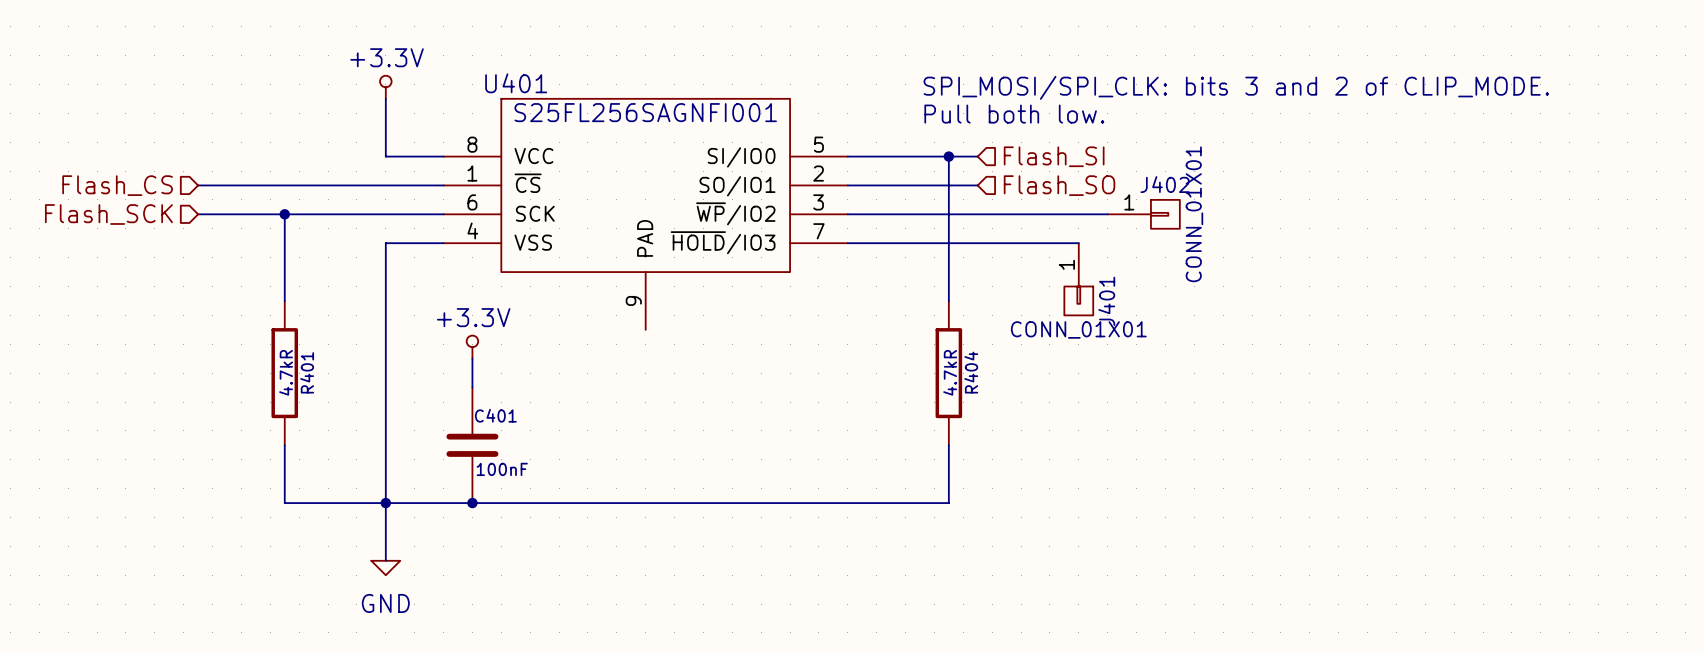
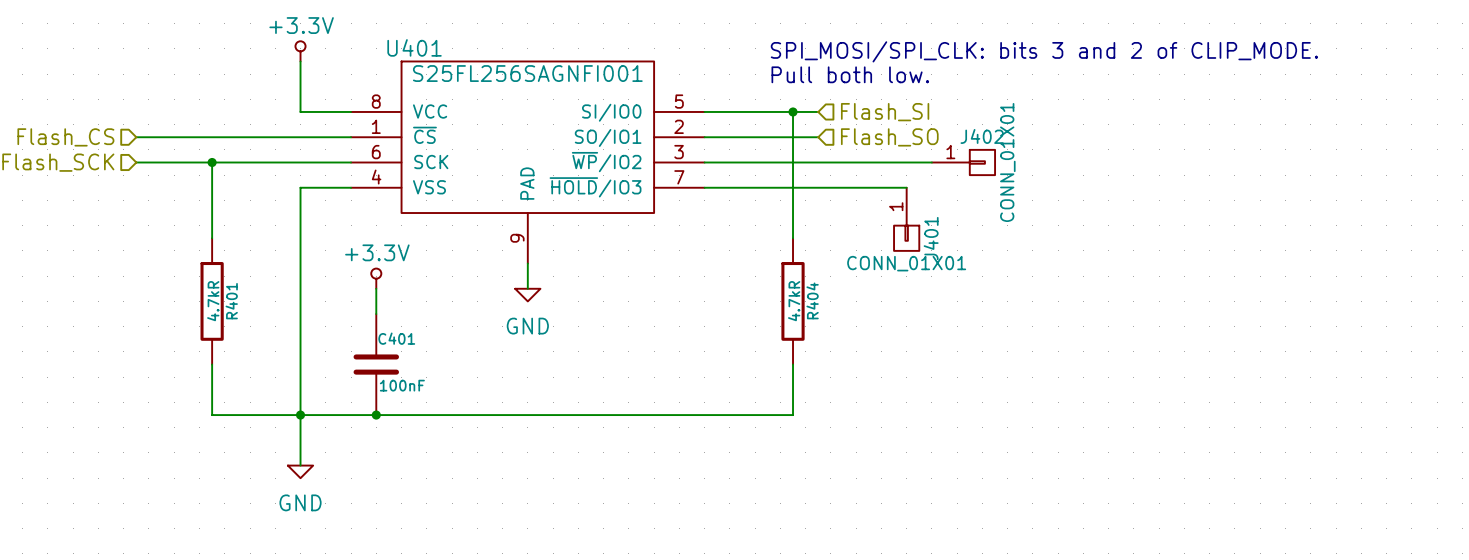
wire: none -> (527, 263) (527, 288)
power symbol: none -> GND (527, 295)

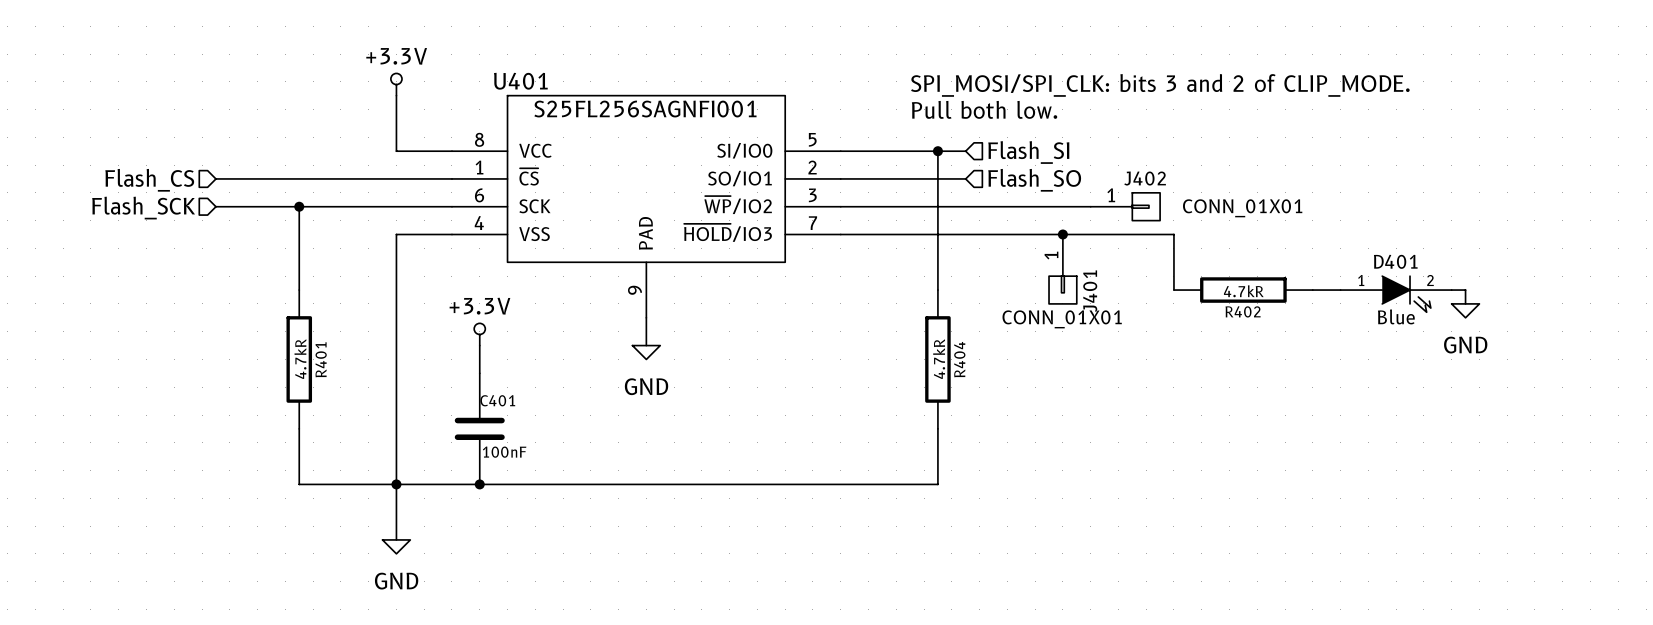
J402 value rotation: 0° (1007, 162) -> 90° clockwise (1242, 208)
wire: none -> (1062, 234) (1173, 234) (1173, 290)
junction: none -> (1062, 234)
R402: none -> 4.7kR (1243, 290)
wire: none -> (1312, 290) (1340, 290)
wire: none -> (1451, 290) (1465, 290) (1465, 303)
D401: none -> Blue (1396, 294)
power symbol: none -> GND (1465, 310)

